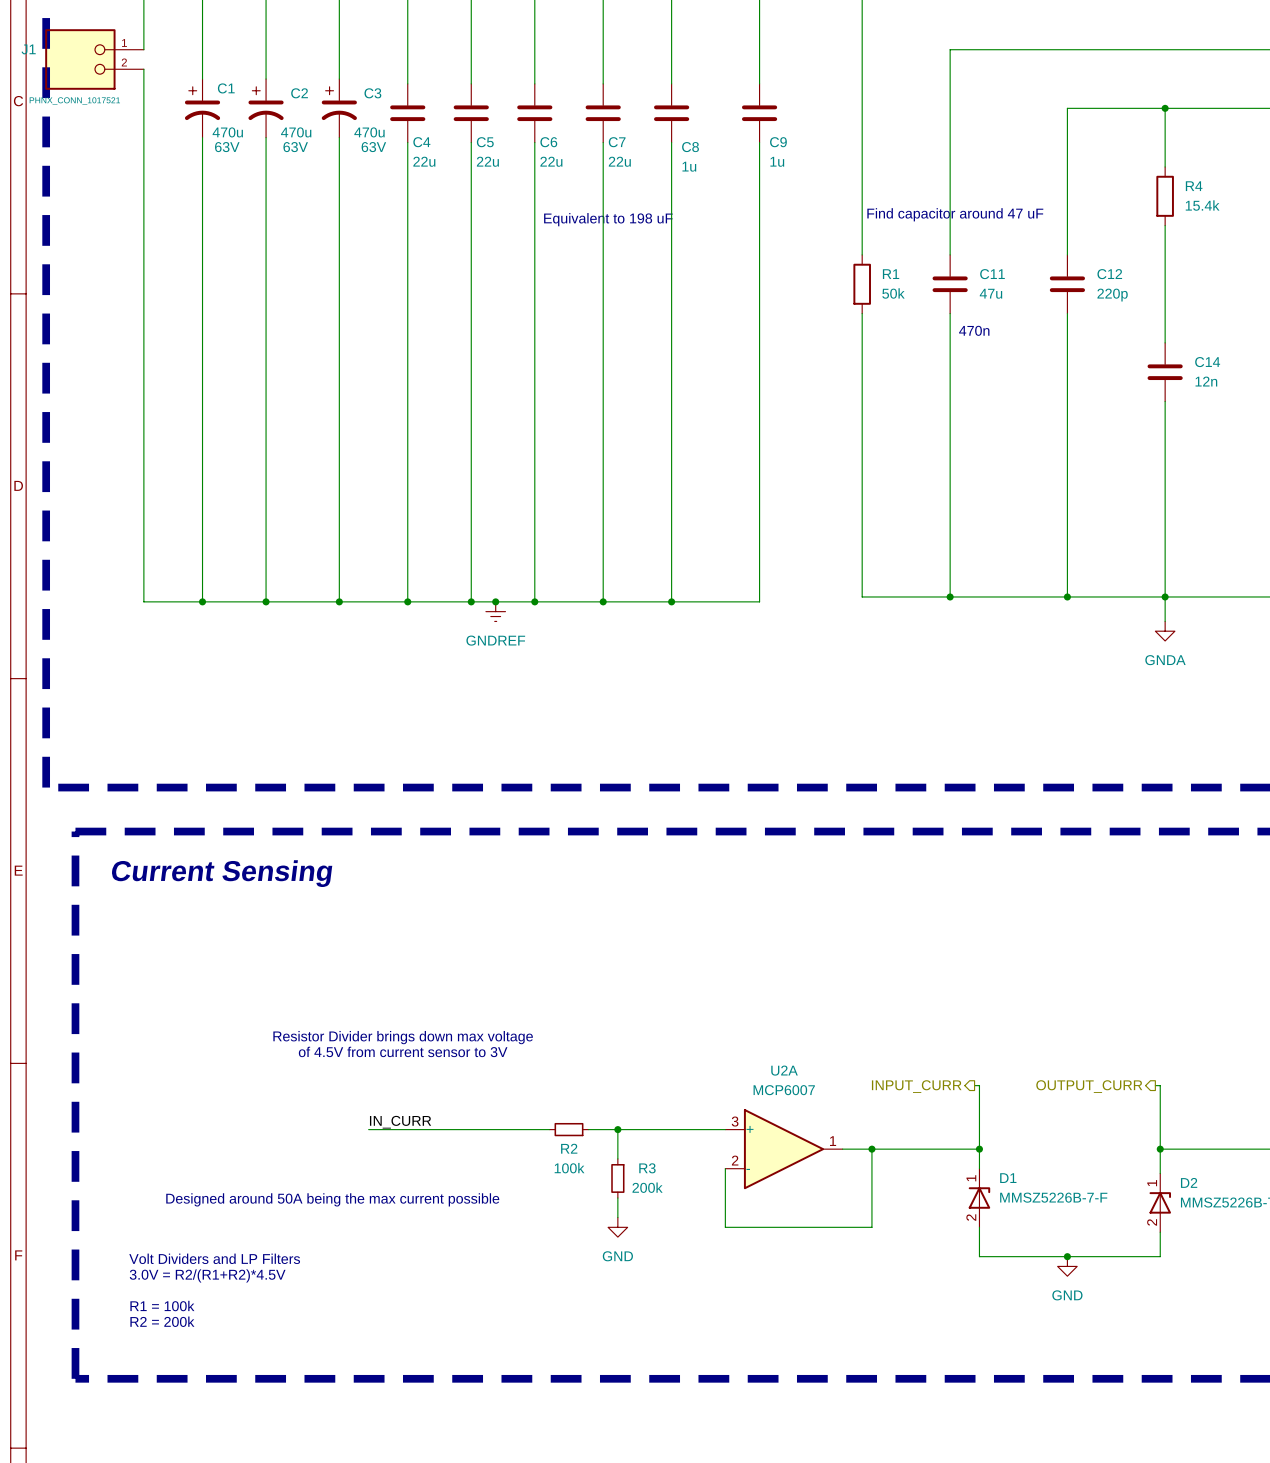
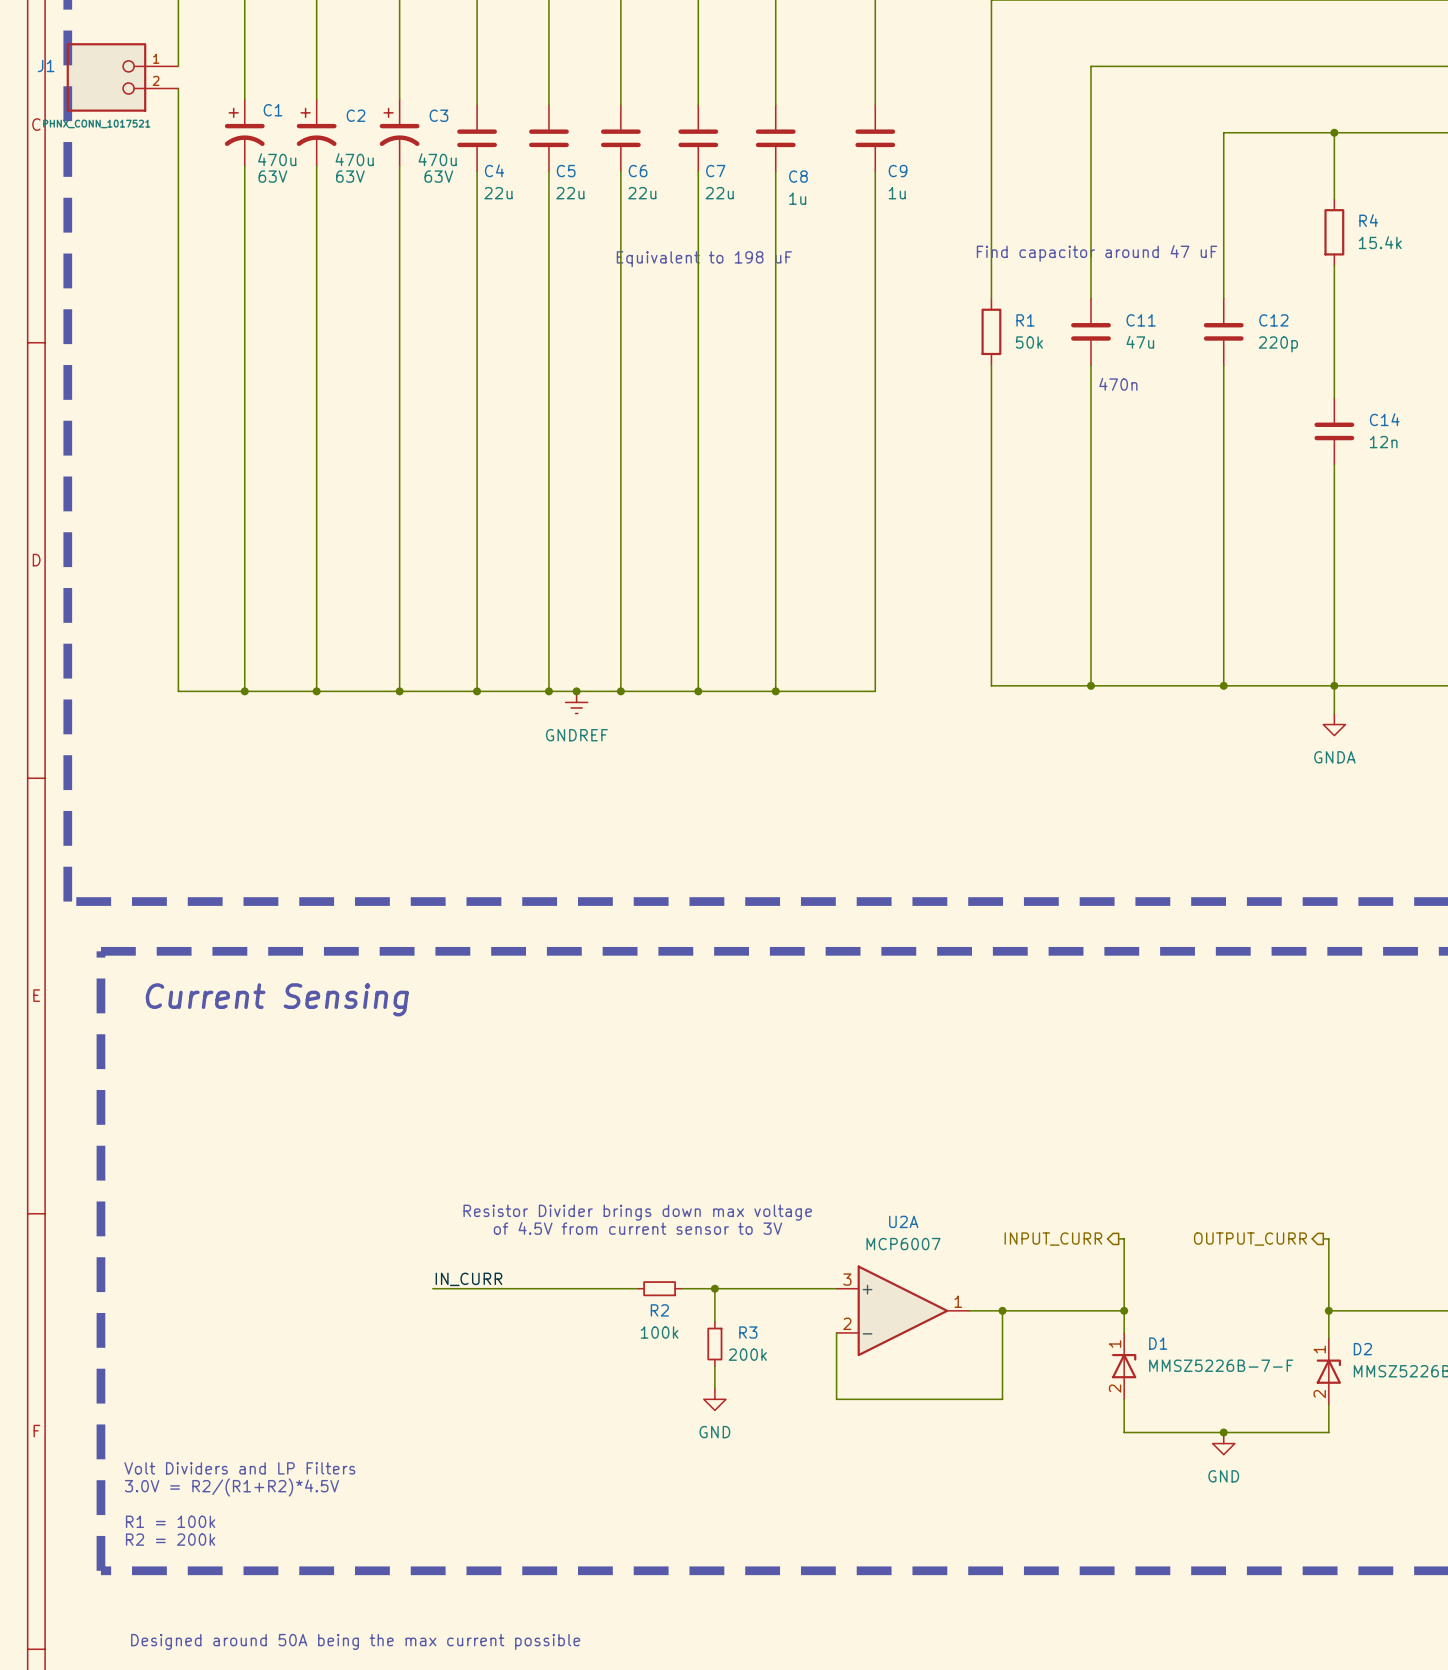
text position: Resistor Divider brings down max voltage (403, 1037) -> Resistor Divider brings down max voltage (637, 1212)
text position: of 4.5V from current sensor to 3V (403, 1051) -> of 4.5V from current sensor to 3V (637, 1228)
text: Designed around 50A being the max current possible (332, 1199) -> none
text position: Volt Dividers and LP Filters (214, 1258) -> Volt Dividers and LP Filters (239, 1468)
text position: 3.0V = R2/(R1+R2)*4.5V (207, 1275) -> 3.0V = R2/(R1+R2)*4.5V (231, 1487)
text position: R1 = 100k (162, 1306) -> R1 = 100k (170, 1521)
text position: R2 = 200k (162, 1321) -> R2 = 200k (170, 1539)
text: none -> Designed around 50A being the max current possible (355, 1641)

